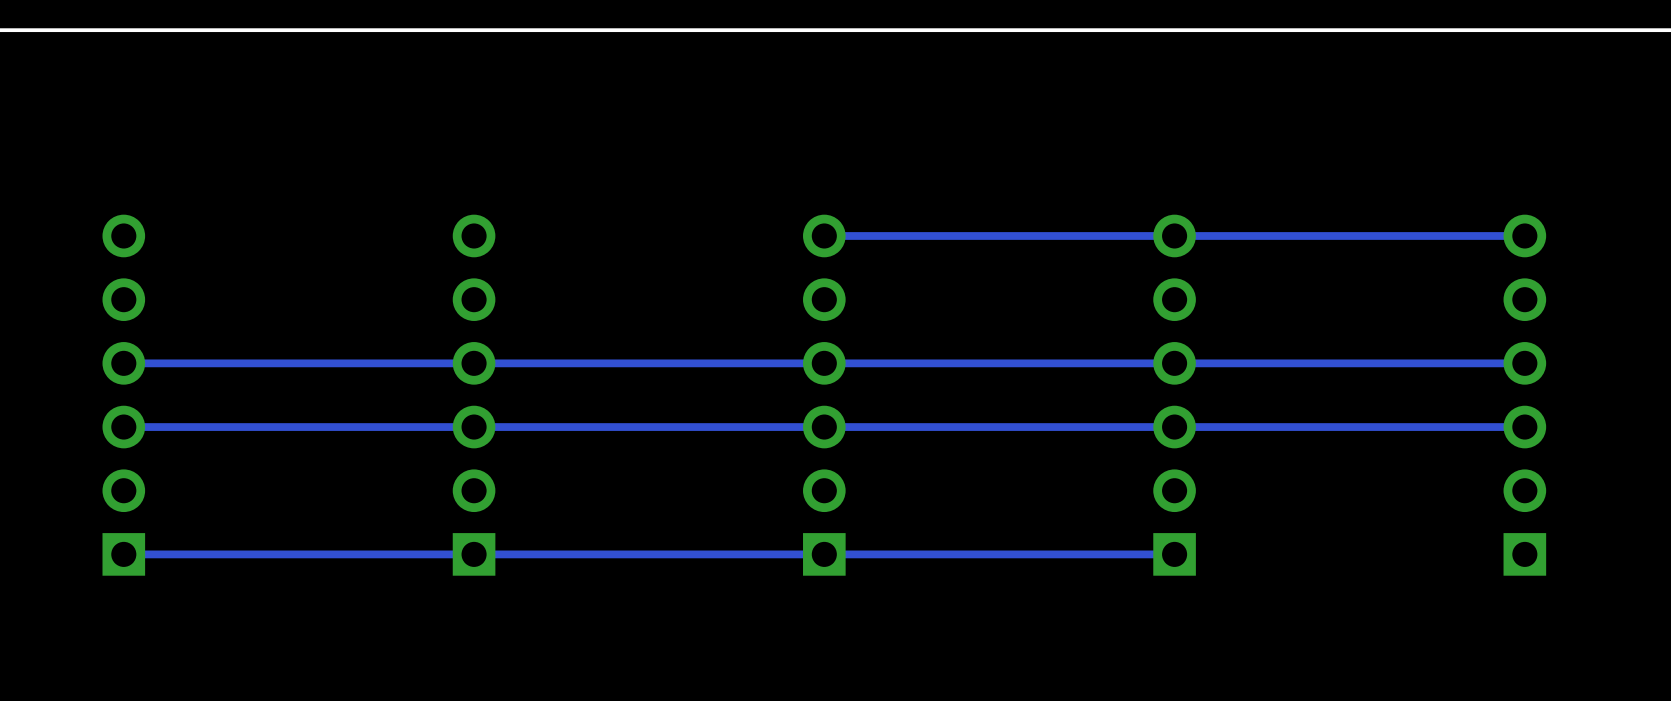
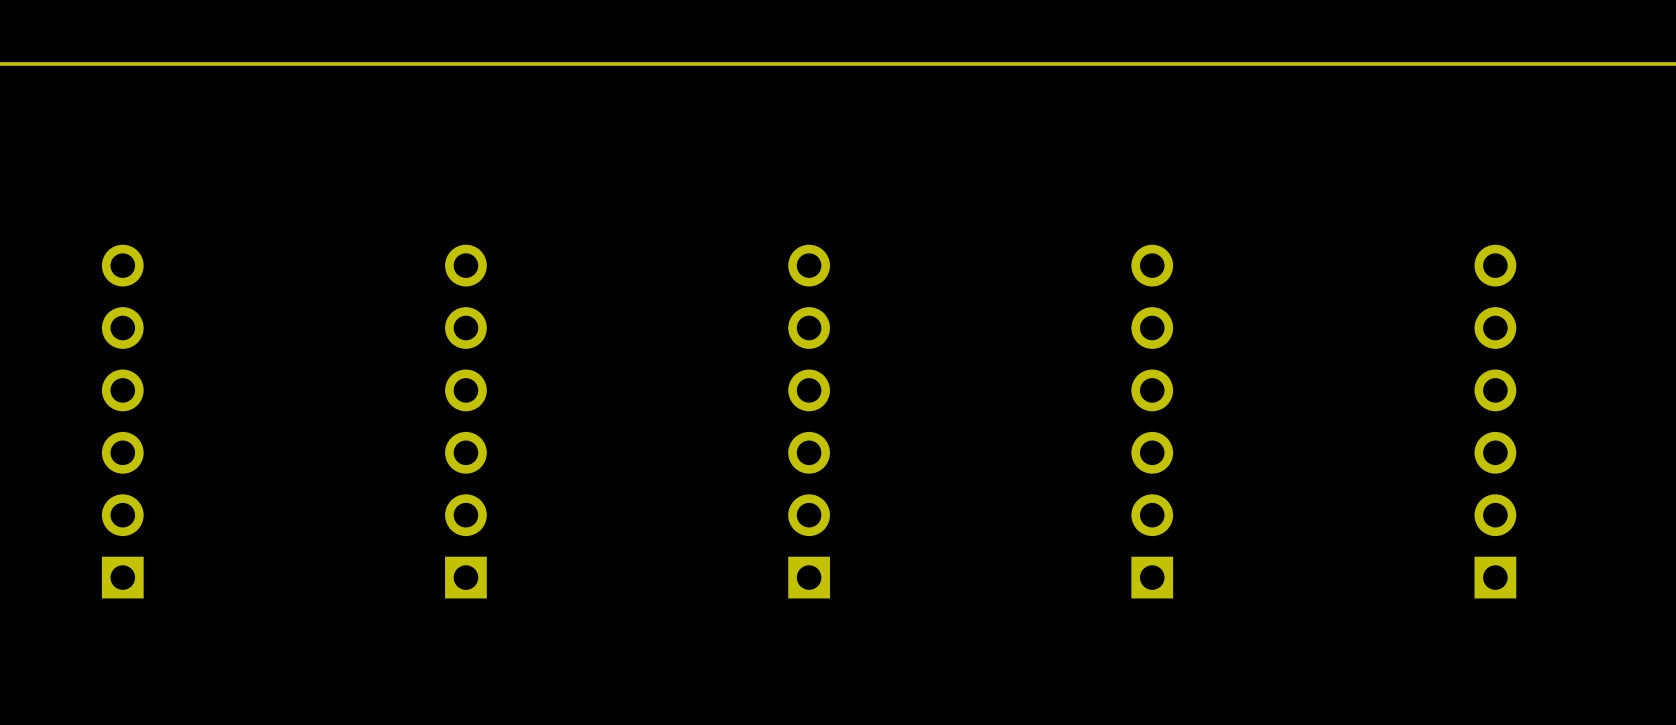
track: (1524, 235) (824, 235) -> none
track: (1524, 363) (123, 363) -> none
track: (1524, 427) (123, 427) -> none
track: (1174, 554) (123, 554) -> none

